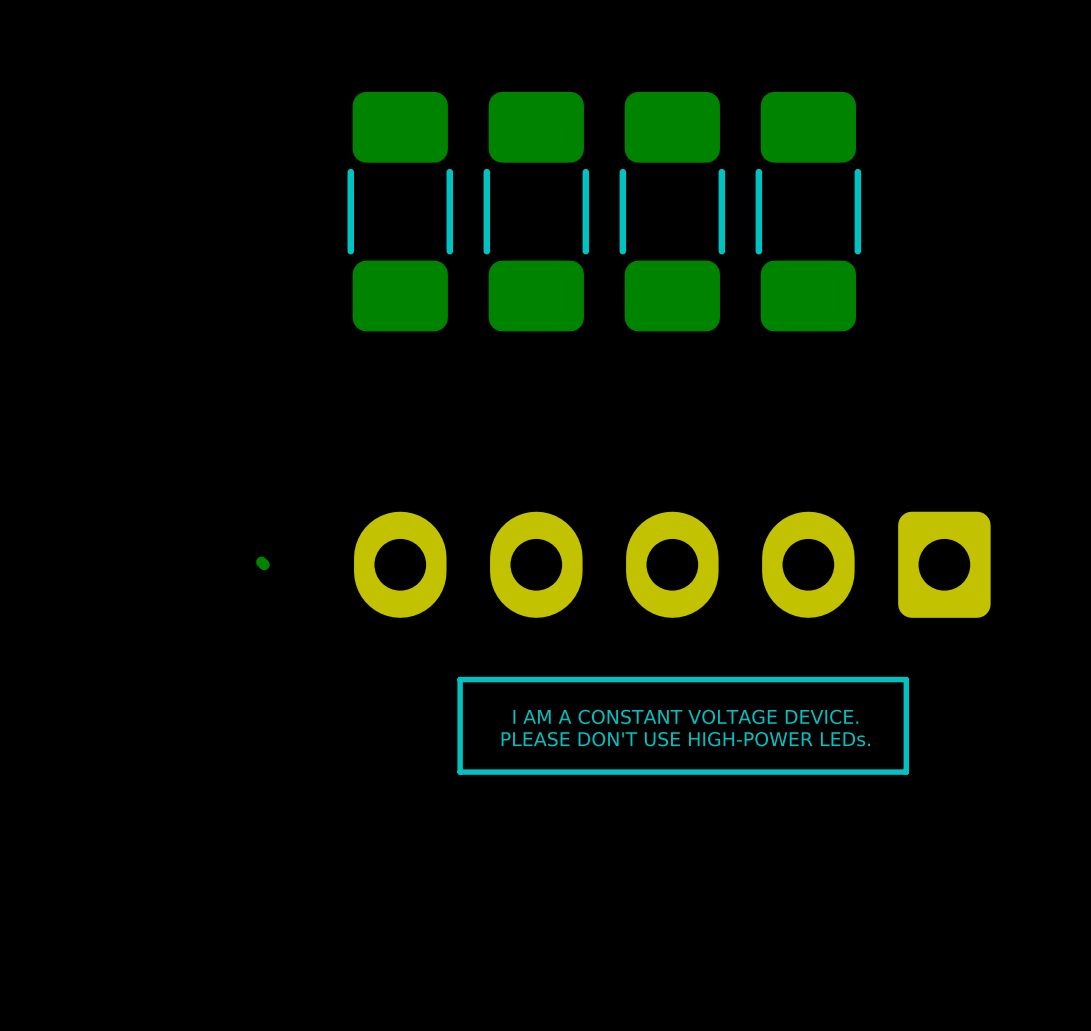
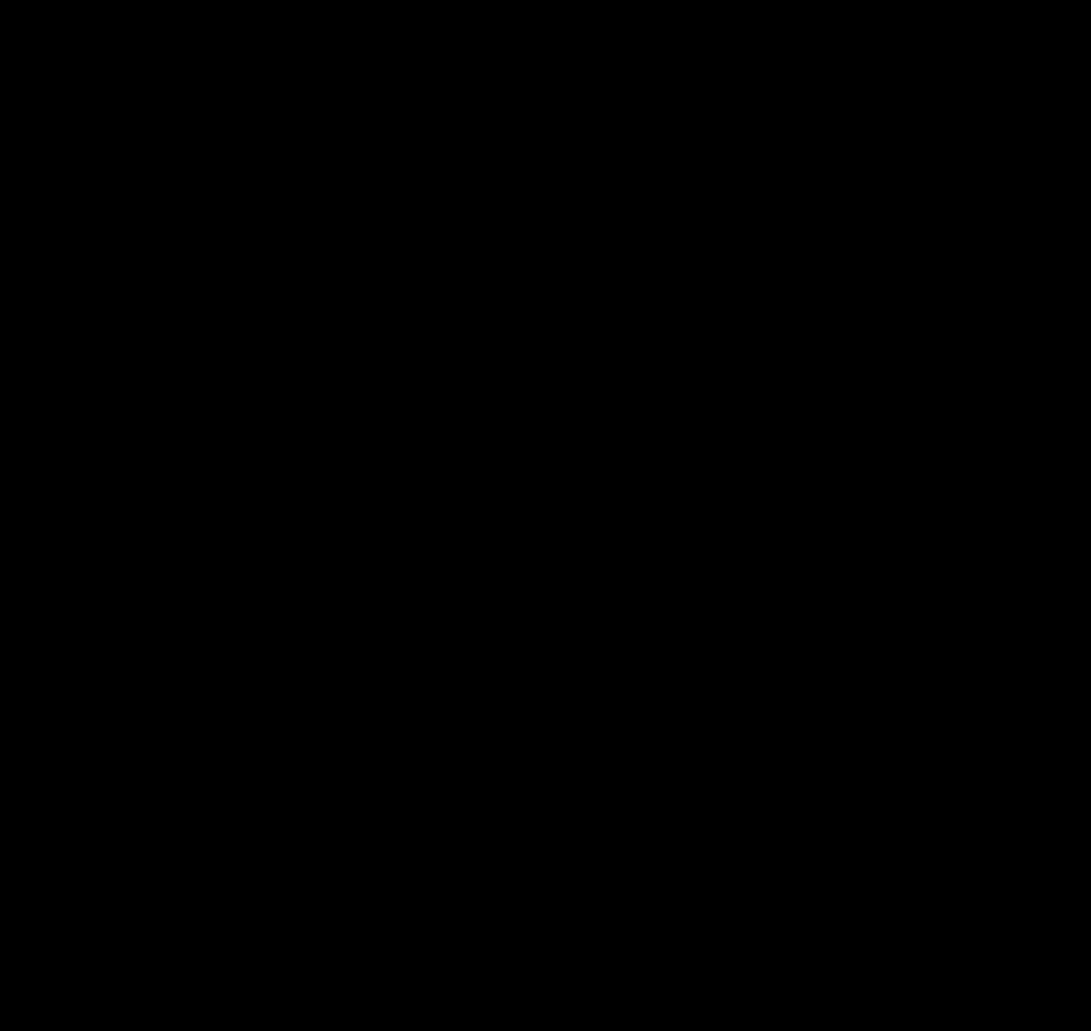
part: (400, 211) -> none
part: (536, 211) -> none
part: (672, 211) -> none
part: (808, 211) -> none
bottom track: (261, 562) (264, 564) -> none
part: (672, 564) -> none
line: (906, 679) (460, 679) (460, 772) (906, 772) (906, 679) -> none
text: I AM A CONSTANT VOLTAGE DEVICE. (685, 716) -> none
text: PLEASE DON'T USE HIGH-POWER LEDs. (685, 739) -> none

